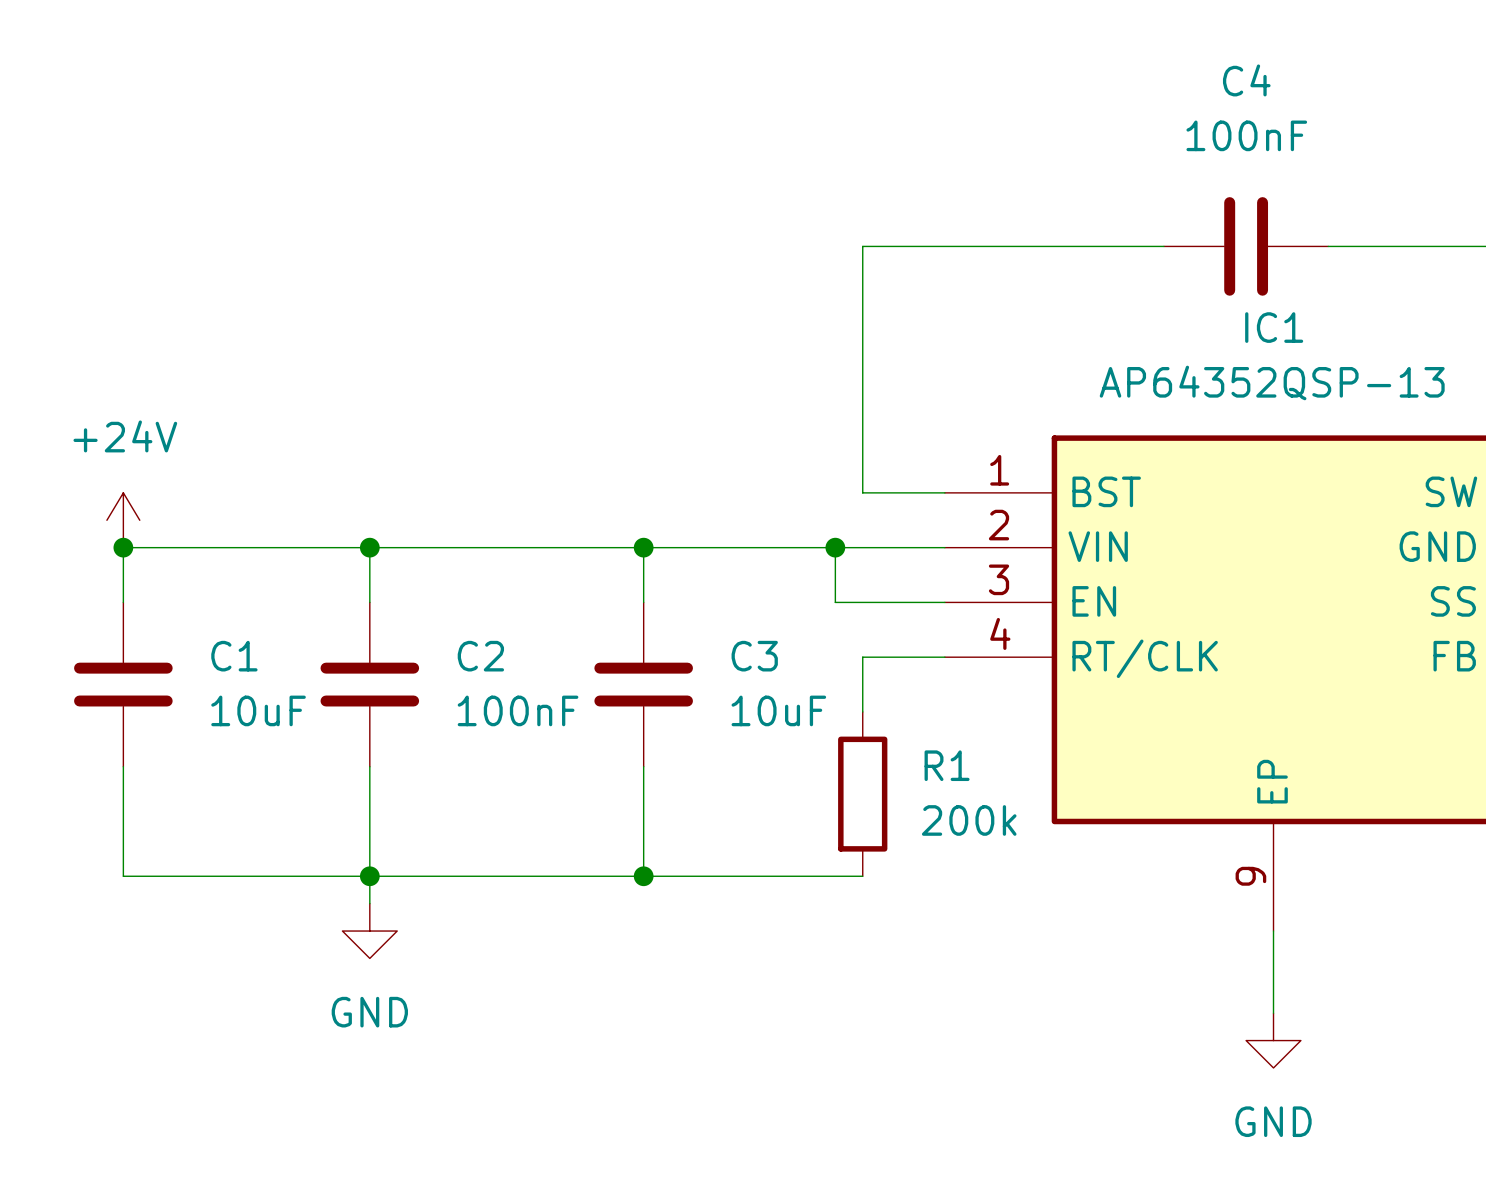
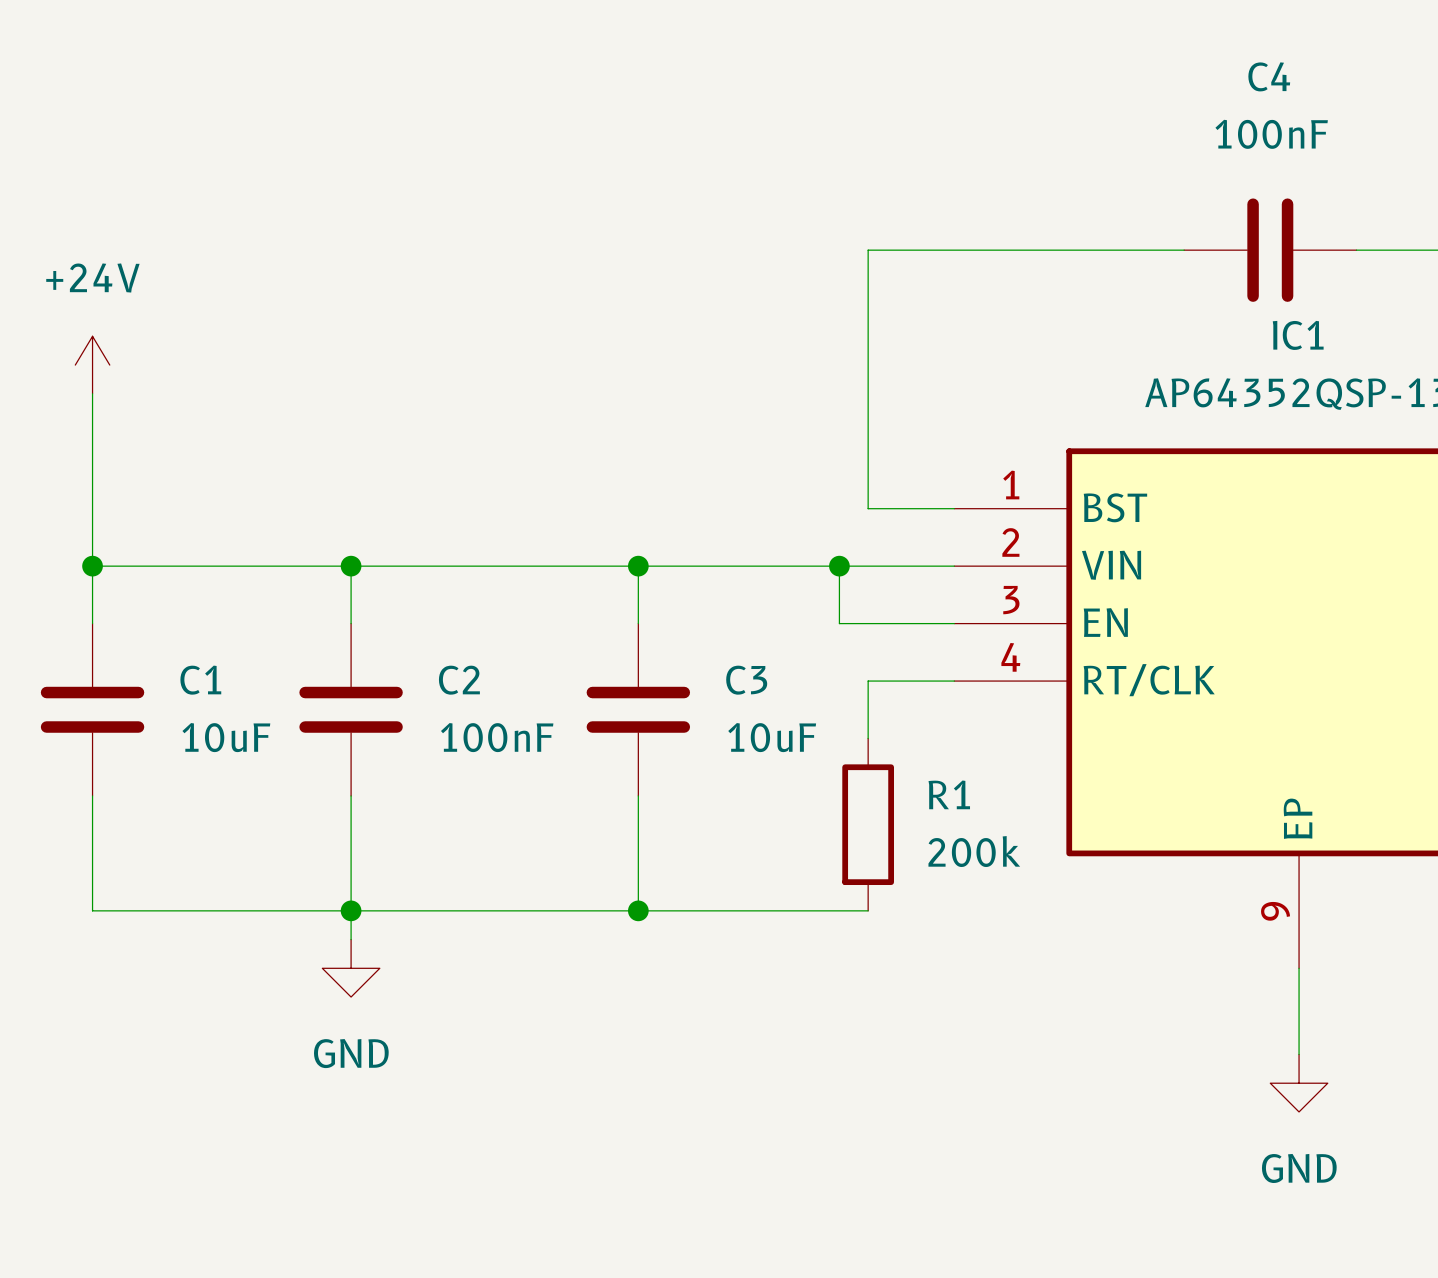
wire: none -> (92, 393) (92, 566)
power symbol position: +24V (123, 520) -> +24V (92, 365)

